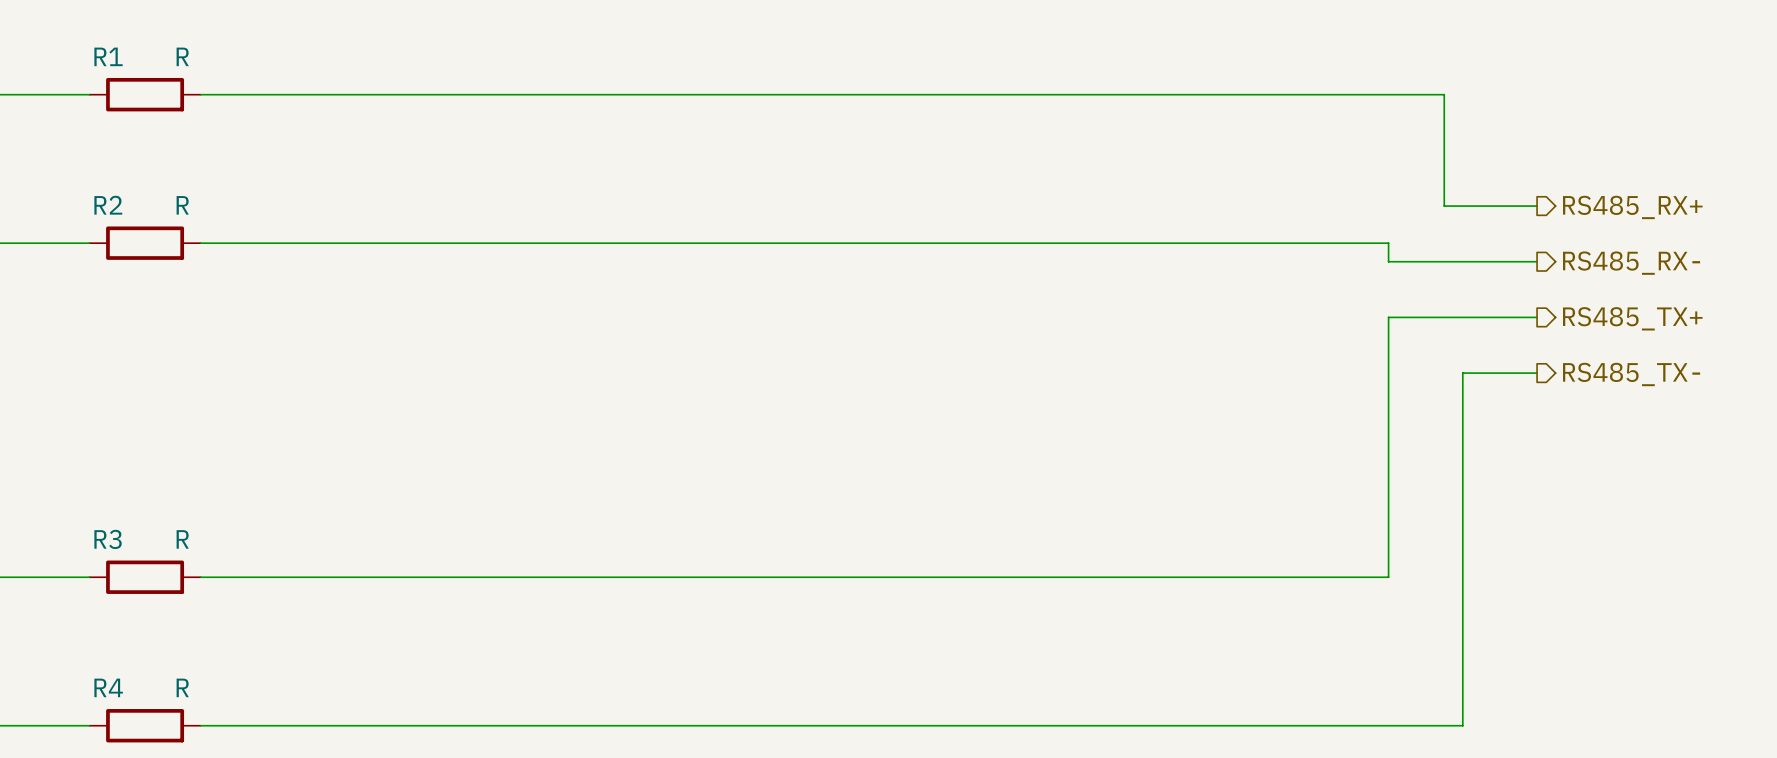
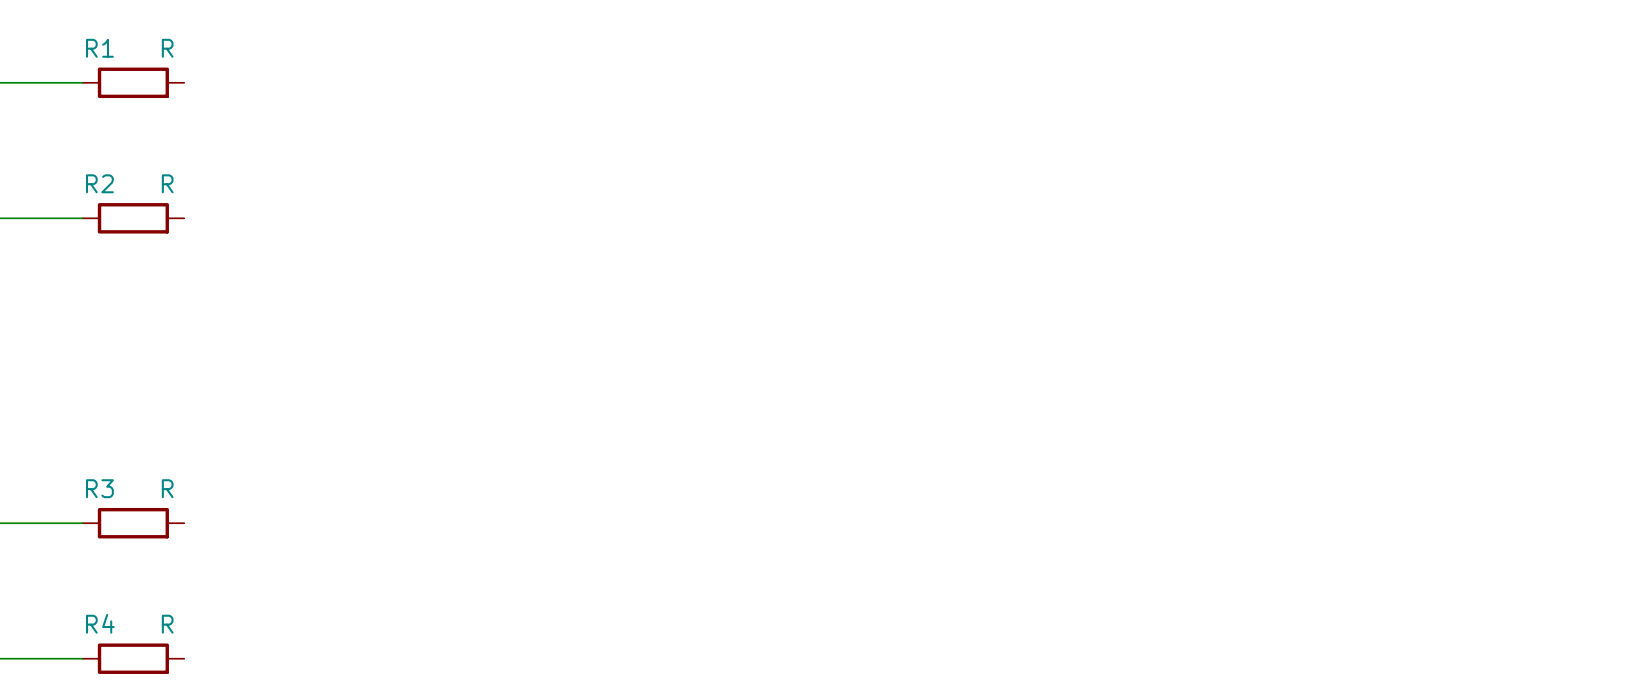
wire: (200, 94) (1444, 94) (1444, 206) (1537, 206) -> none
hierarchical label: RS485_RX+ (1632, 207) -> none
wire: (200, 243) (1388, 243) (1388, 261) (1537, 261) -> none
hierarchical label: RS485_RX- (1631, 263) -> none
wire: (1537, 317) (1388, 317) (1388, 577) (200, 577) -> none
hierarchical label: RS485_TX+ (1632, 318) -> none
wire: (1537, 373) (1462, 373) (1462, 725) (200, 725) -> none
hierarchical label: RS485_TX- (1631, 374) -> none

